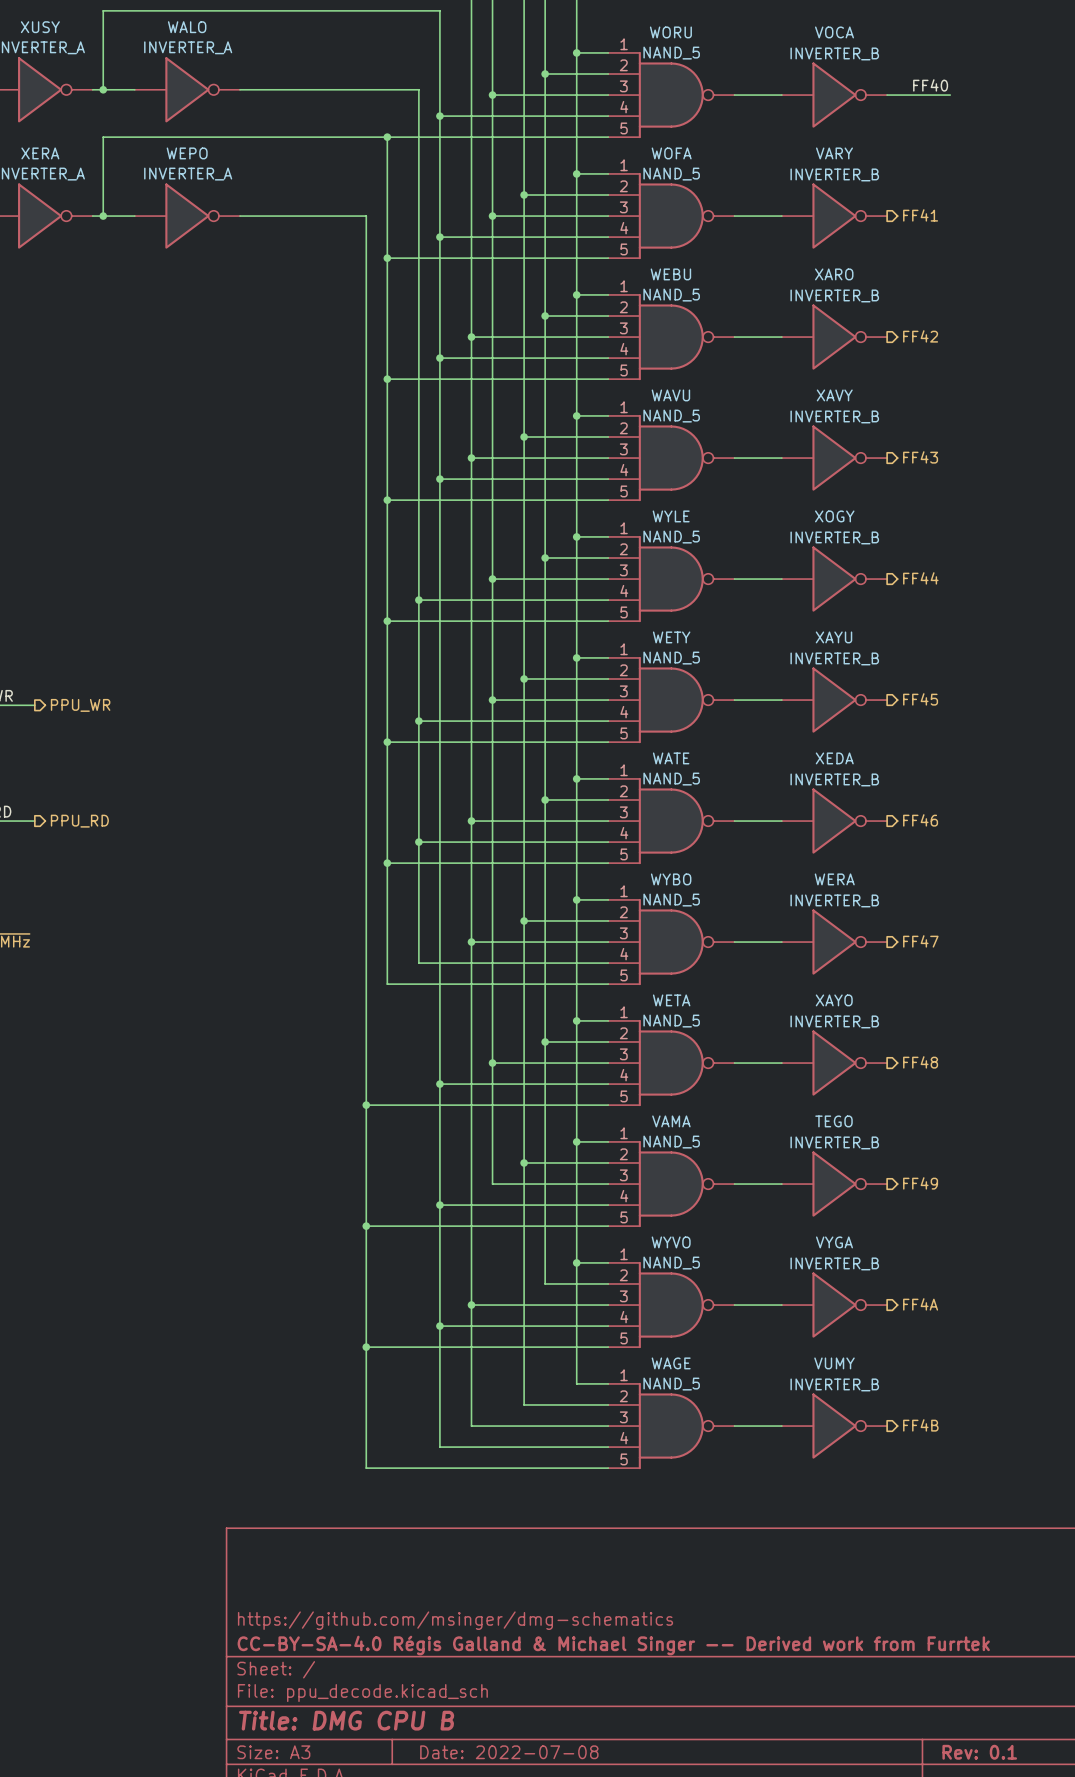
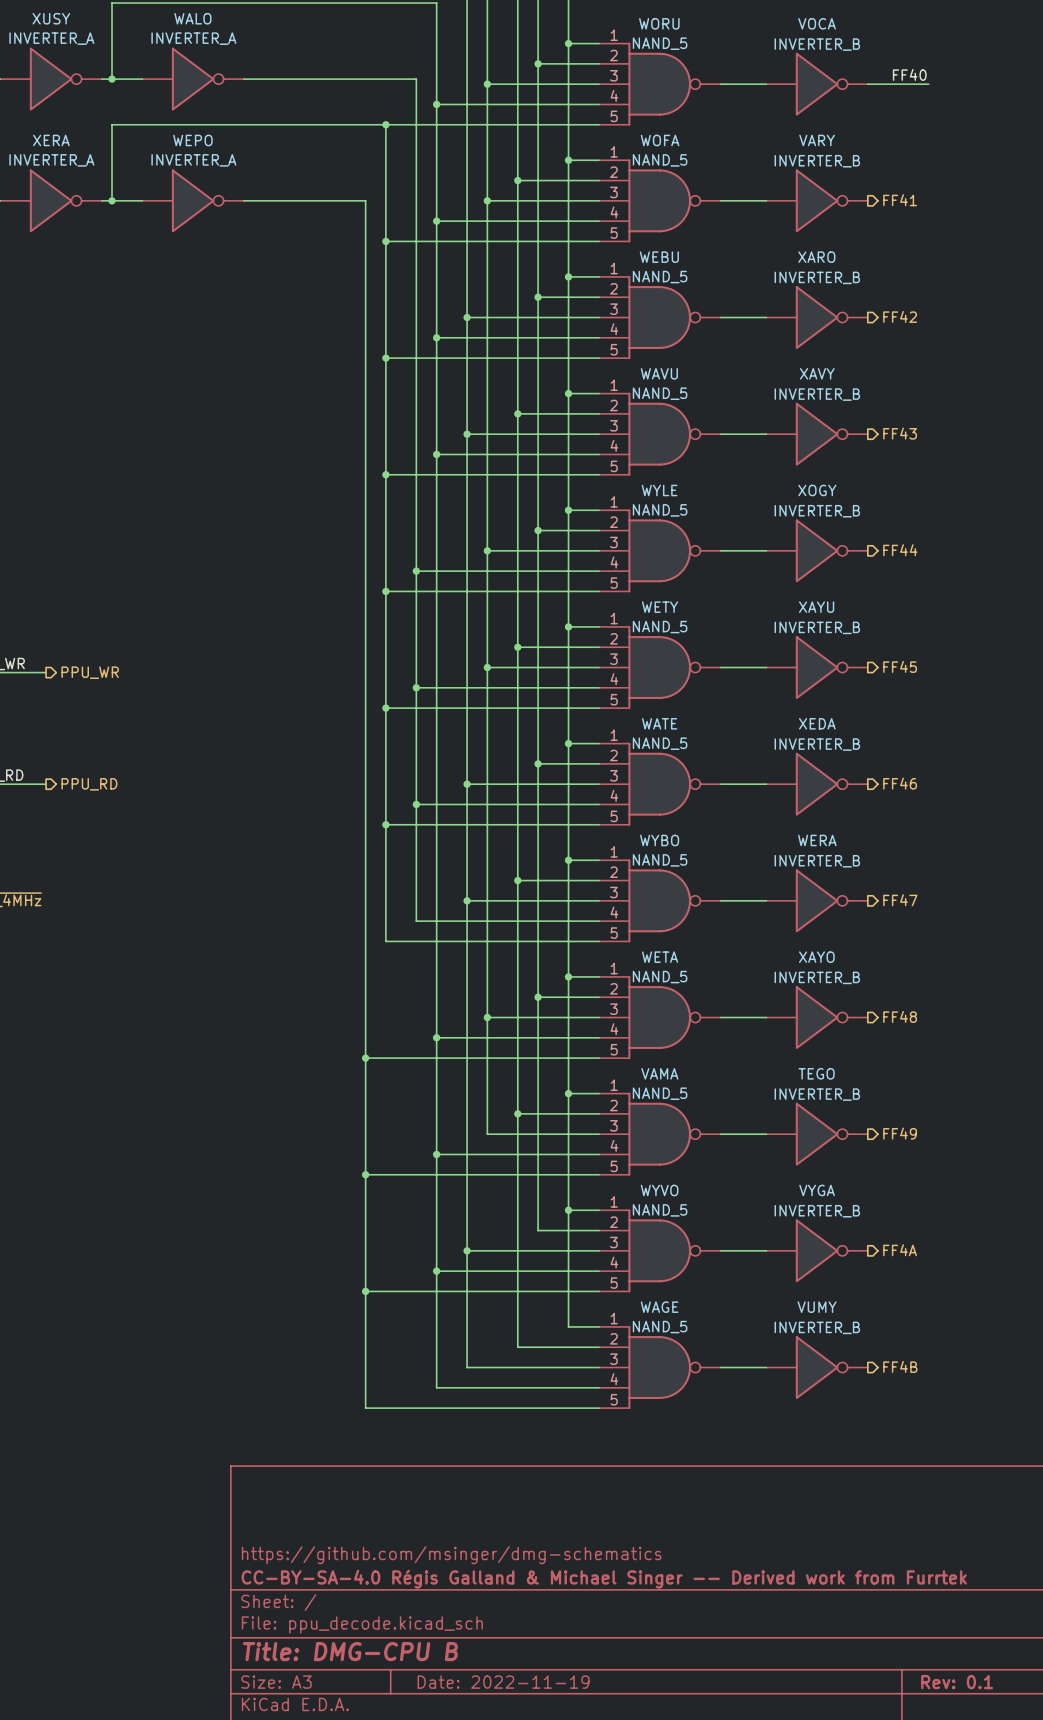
title block: Title: DMG CPU B (346, 1720) -> Title: DMG-CPU B (350, 1651)
title block: Date: 2022-07-08 (509, 1752) -> Date: 2022-11-19 (503, 1682)

